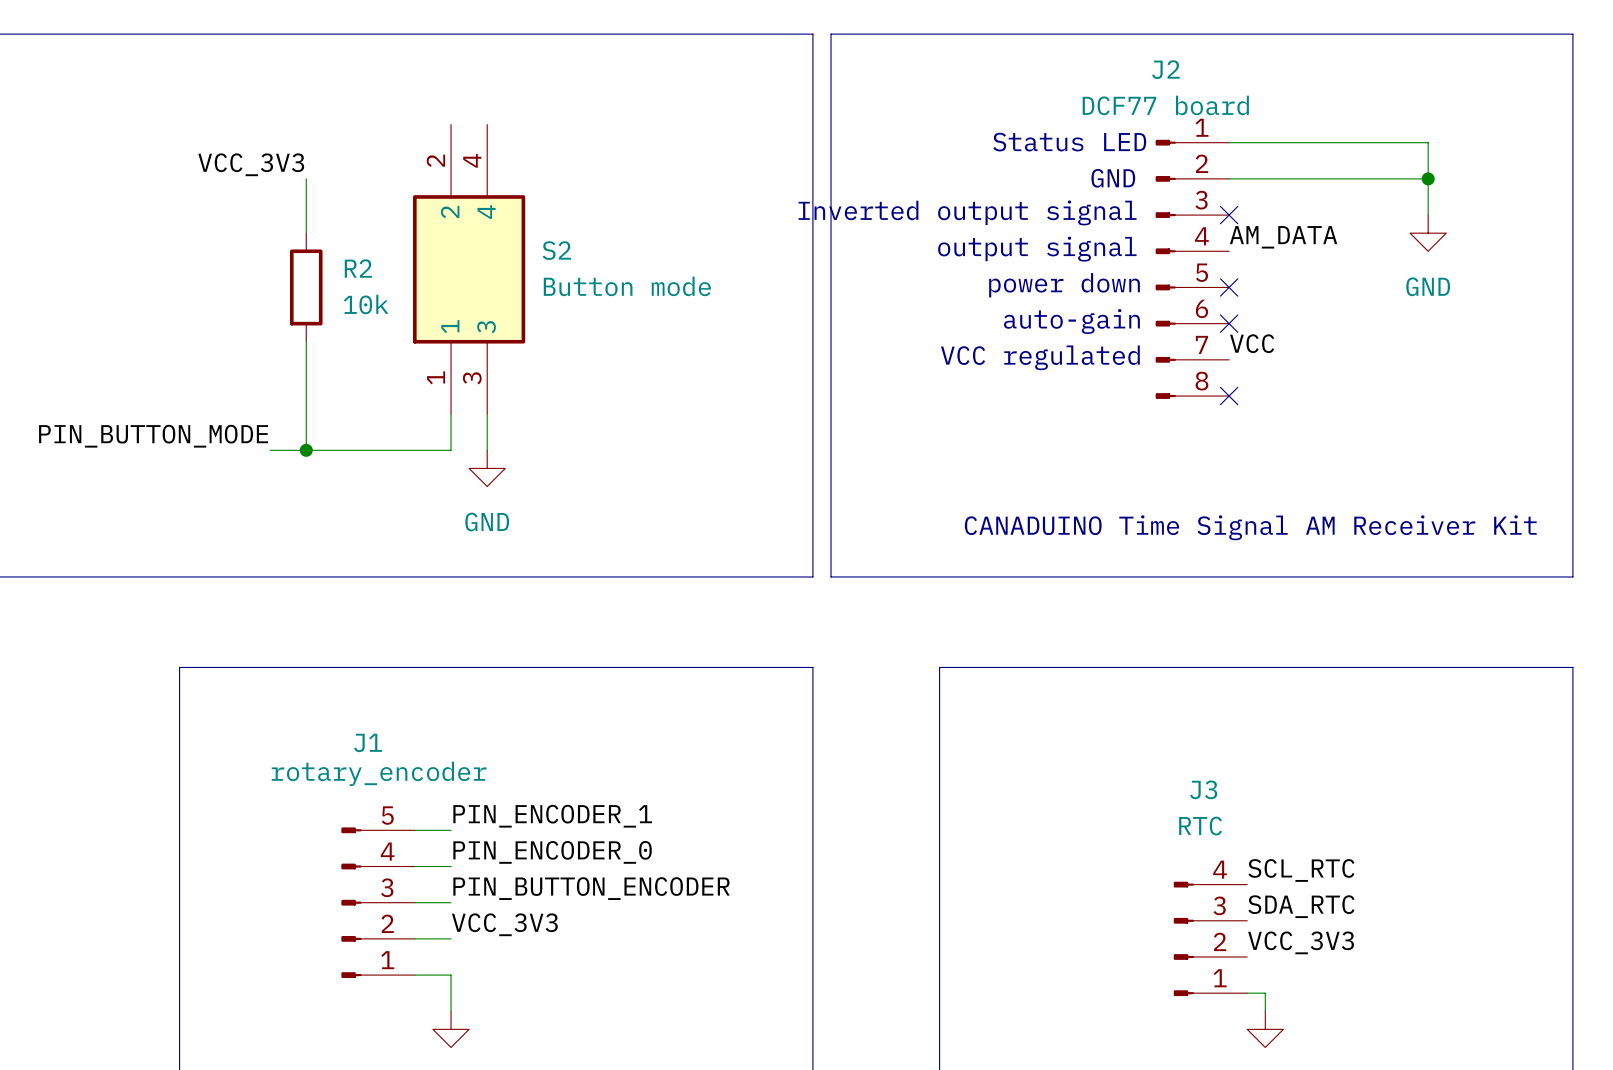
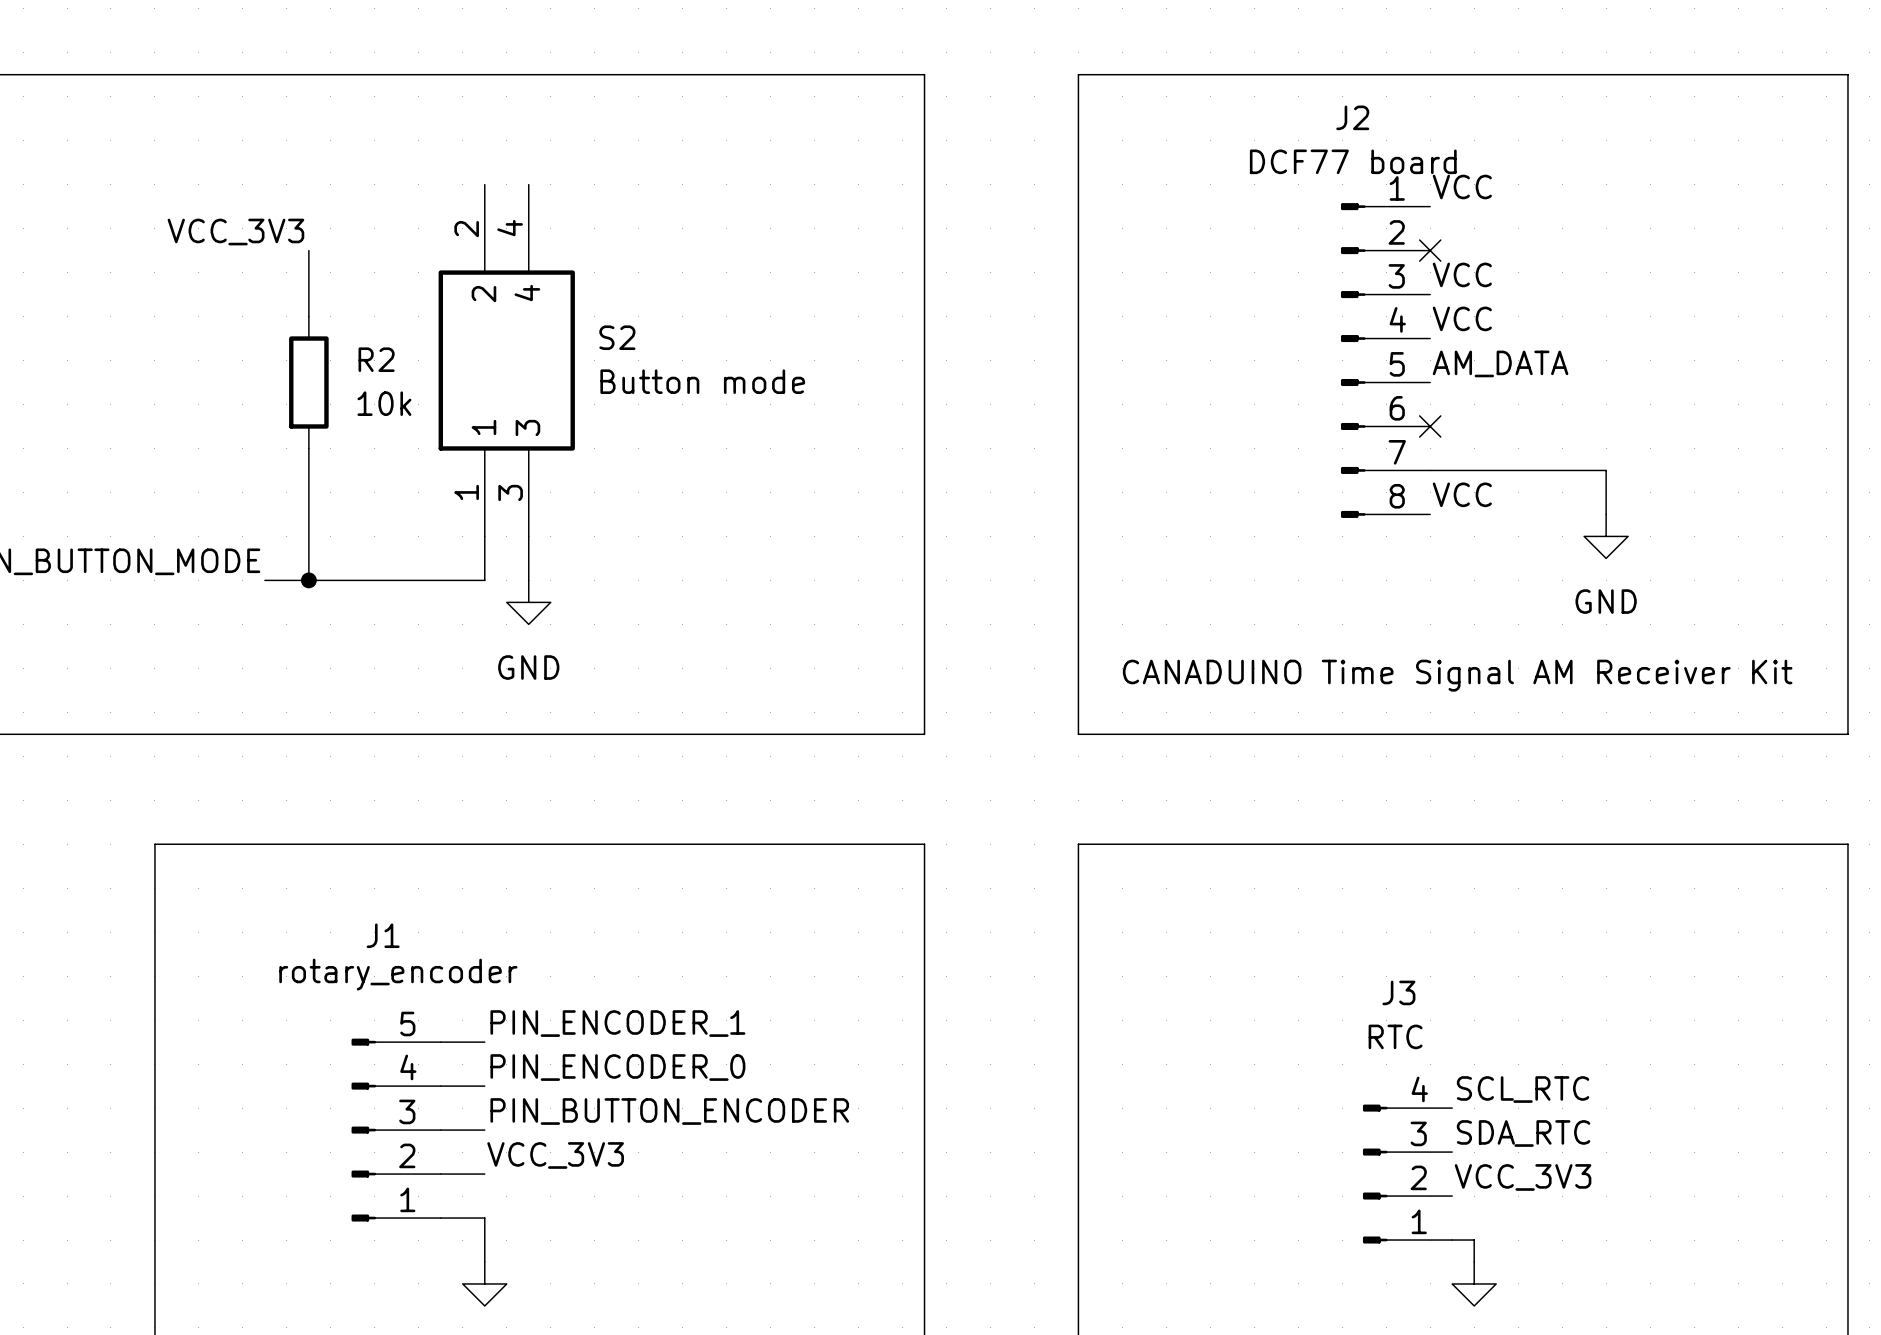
line: (939, 34) (831, 34) (831, 576) (939, 576) -> (1078, 74) (1078, 734)
label: none -> VCC (1462, 186)
text: Status LED (1069, 142) -> none
wire: (1229, 142) (1428, 142) (1428, 215) -> none
text: GND (1113, 178) -> none
wire: (1229, 178) (1428, 178) -> none
junction: (1428, 178) -> none
label: none -> VCC (1462, 274)
text: Inverted output signal (967, 212) -> none
no-connect mark position: (1229, 215) -> (1430, 250)
power symbol position: GND (1428, 233) -> GND (1606, 536)
label: AM_DATA (1283, 237) -> VCC (1462, 318)
text: output signal (1037, 249) -> none
label: none -> AM_DATA (1500, 363)
text: power down (1064, 285) -> none
no-connect mark: (1229, 287) -> none
text: auto-gain (1071, 321) -> none
label position: VCC (1252, 343) -> VCC (1462, 494)
text: VCC regulated (1040, 357) -> none
wire: none -> (1430, 470) (1606, 470) (1606, 514)
no-connect mark: (1229, 396) -> none

